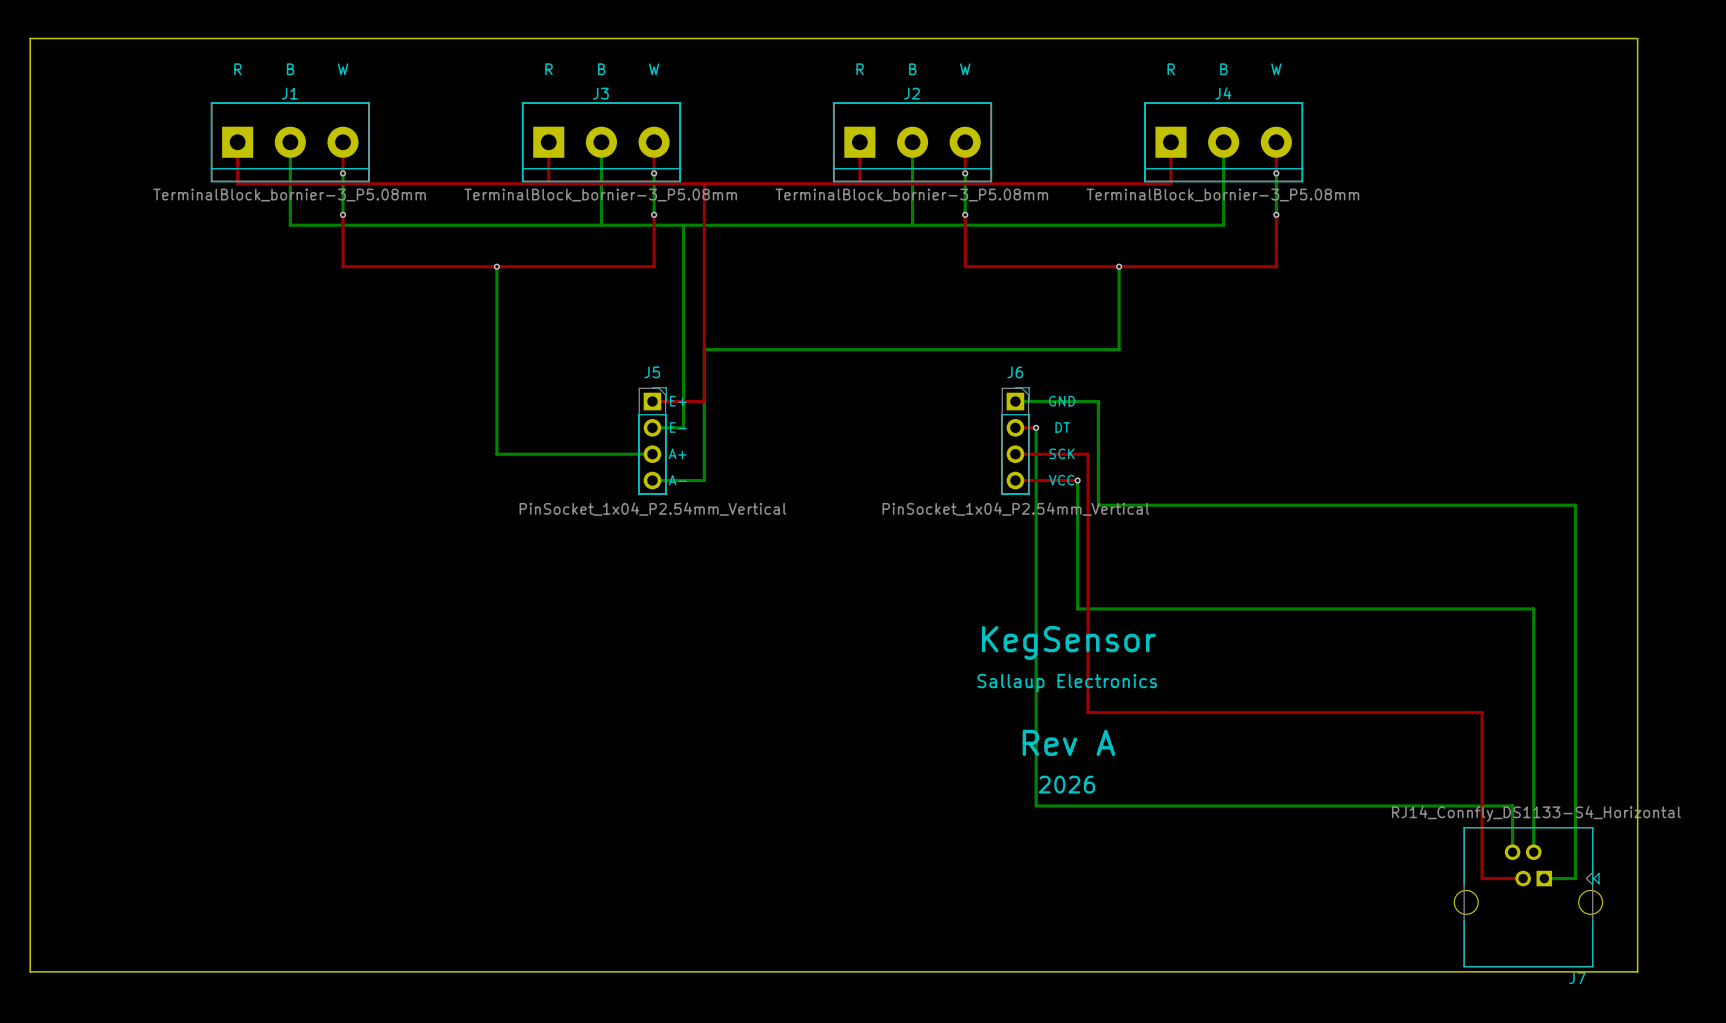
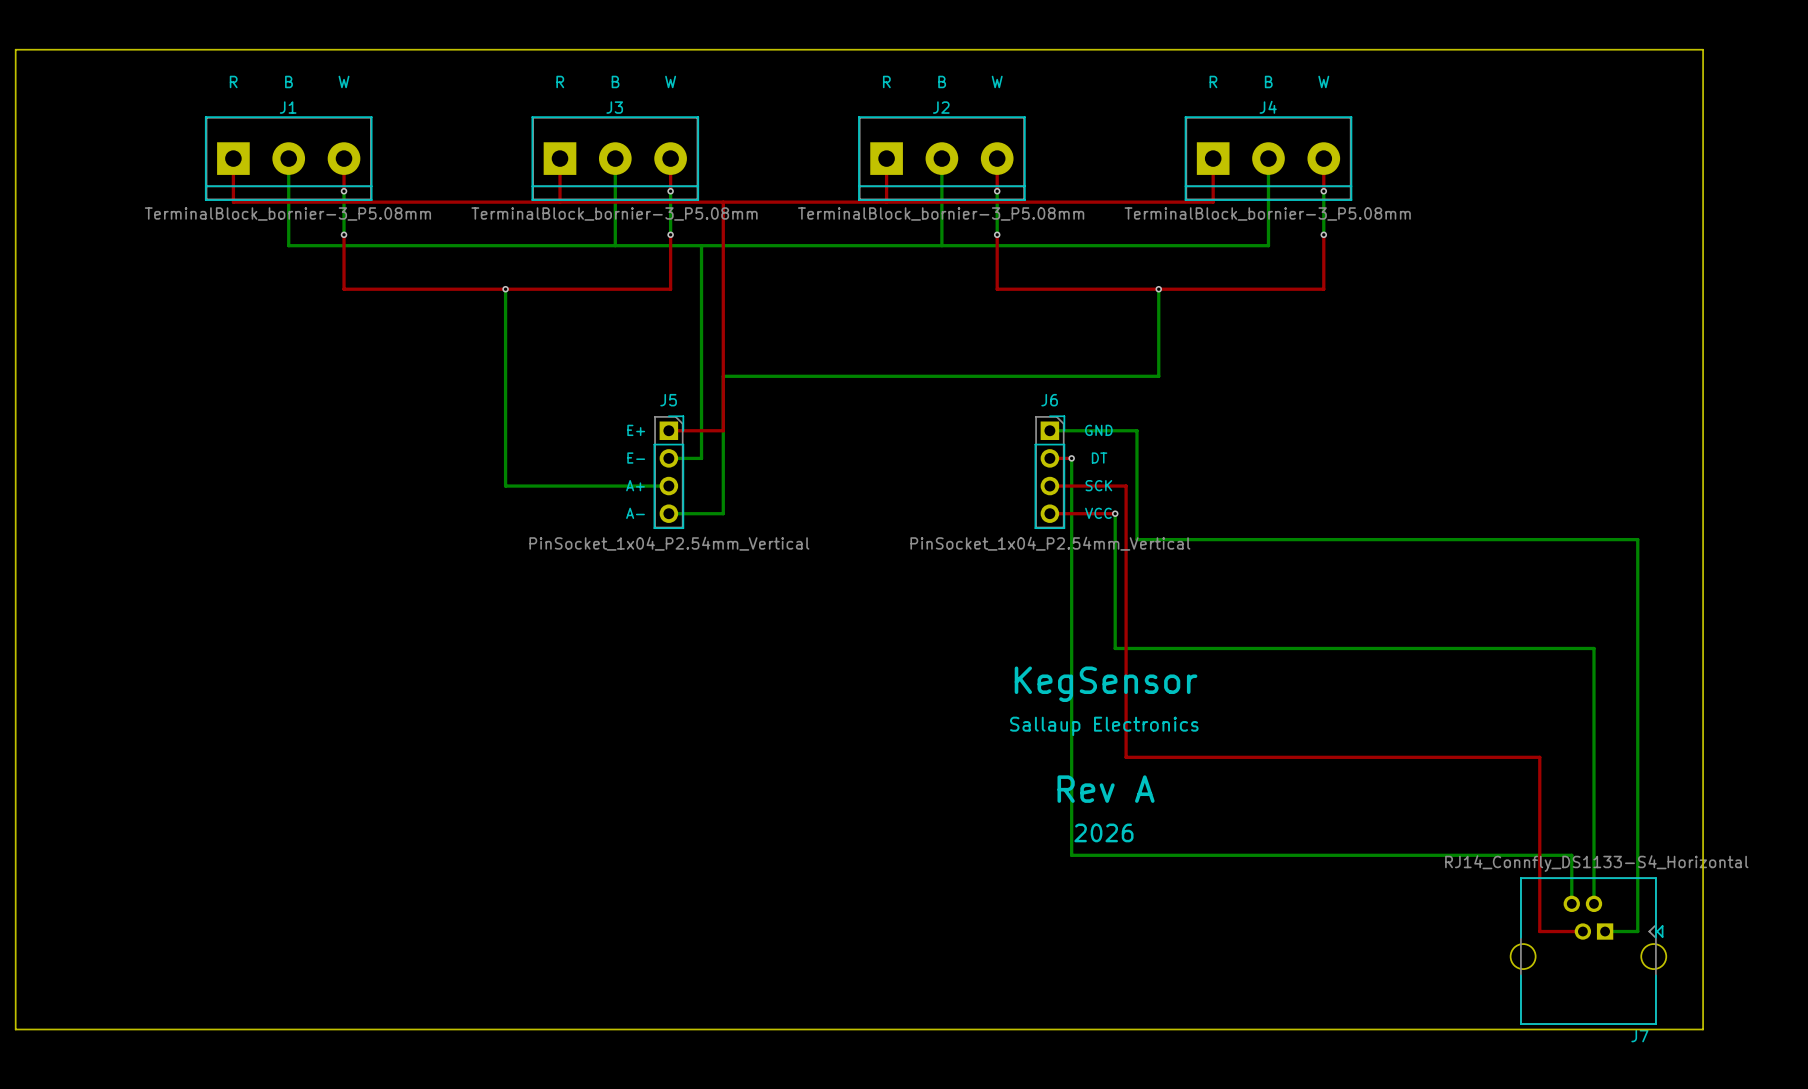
text position: E+ (678, 401) -> E+ (636, 430)
text position: E- (678, 427) -> E- (636, 458)
text position: A+ (677, 453) -> A+ (635, 485)
text position: A- (677, 480) -> A- (635, 513)

